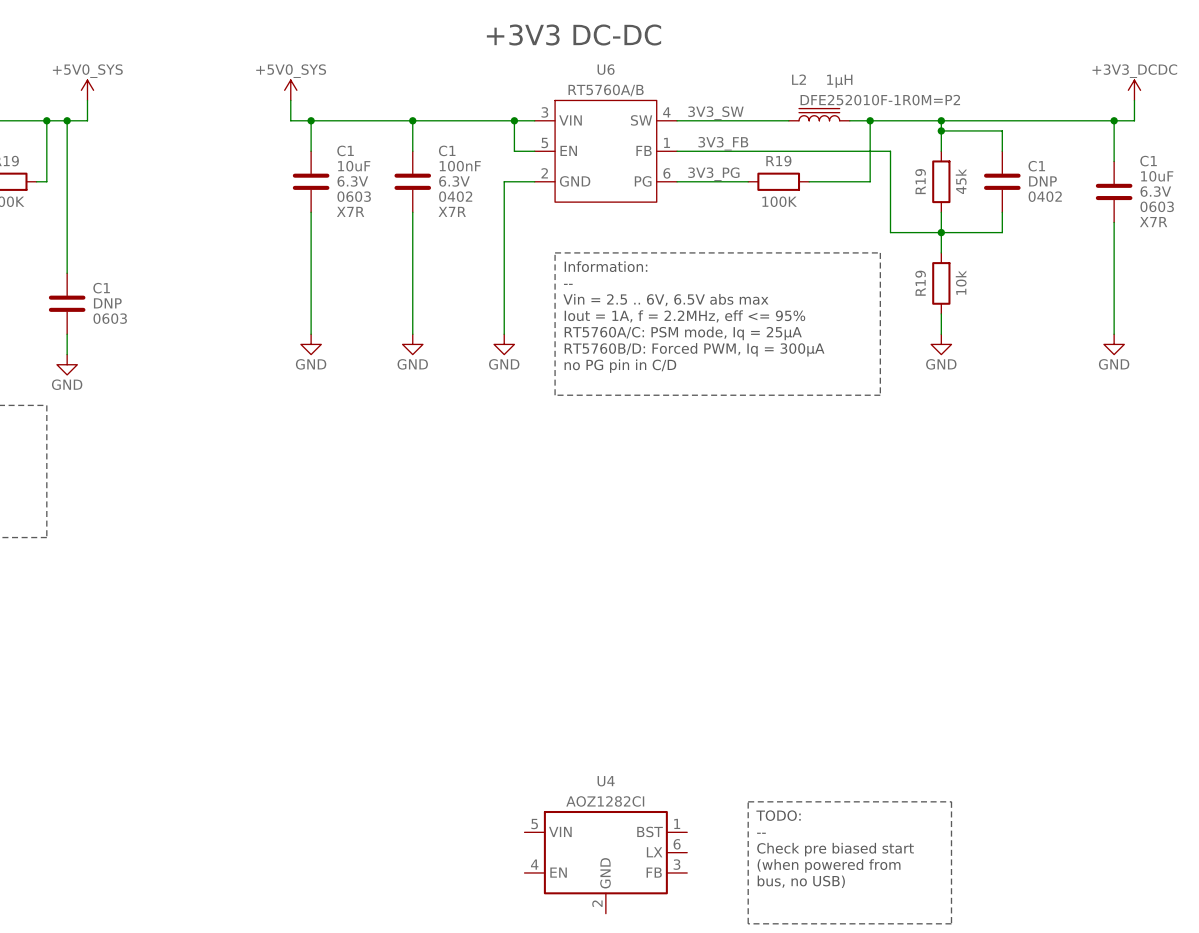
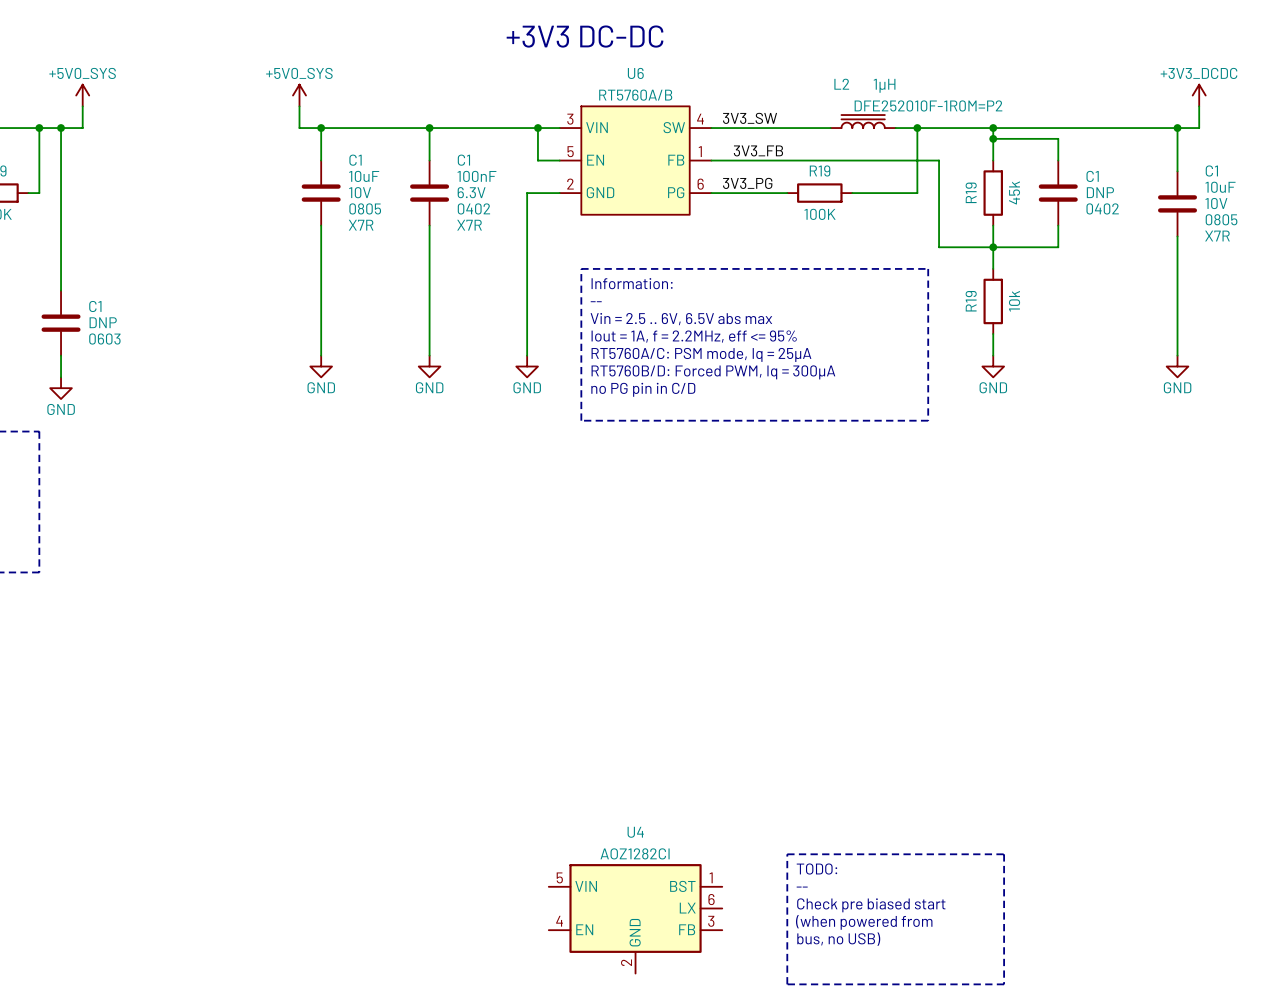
C1 text: 6.3V (352, 181) -> 10V (360, 192)
C1 text: 6.3V (1155, 191) -> 10V (1216, 203)
C1 text: 0603 (354, 196) -> 0805 (365, 208)
C1 text: 0603 (1157, 206) -> 0805 (1221, 219)

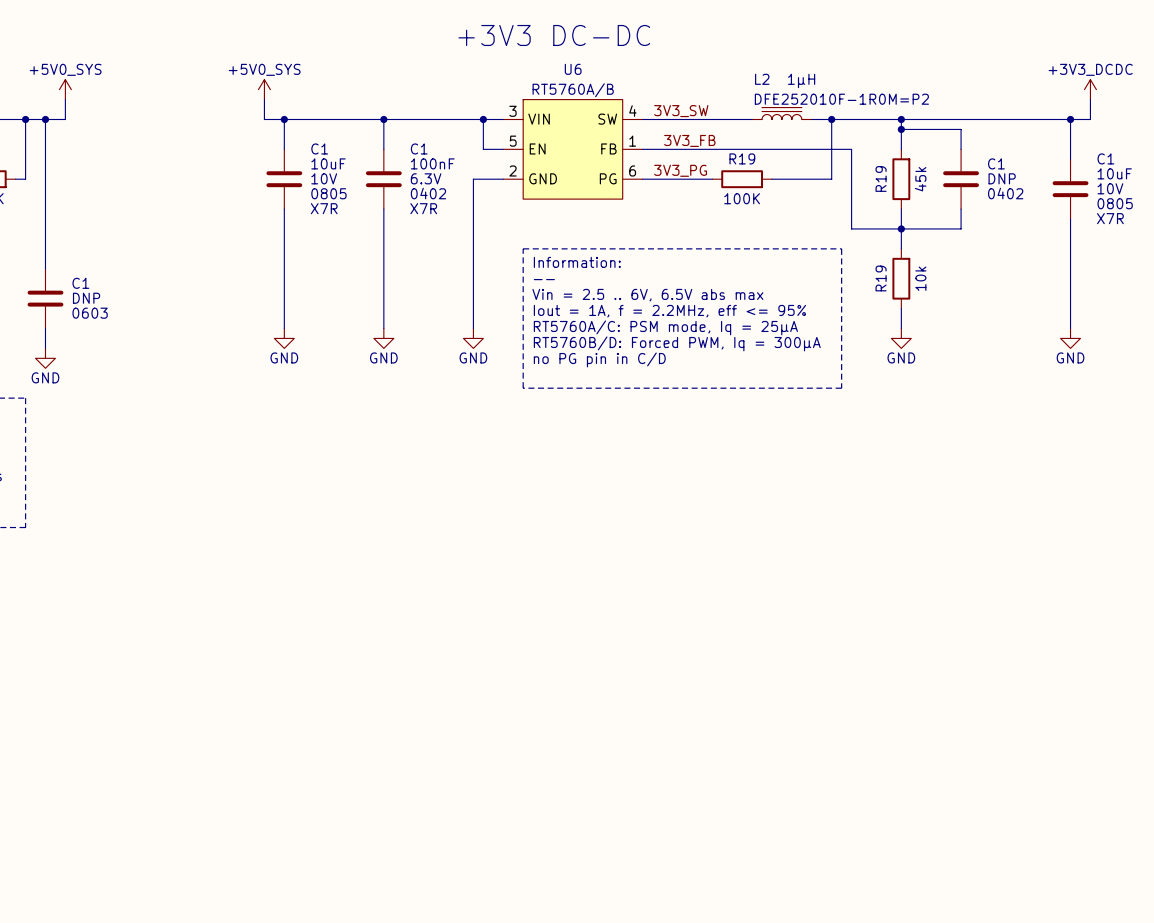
line: (787, 854) (1004, 854) (1004, 984) (787, 984) (787, 854) -> none
text: TODO: (816, 869) -> none
text: -- (802, 887) -> none
text: Check pre biased start (871, 905) -> none
U4: AOZ1282CI (635, 918) -> none
text: (when powered from (864, 922) -> none
text: bus, no USB) (838, 939) -> none

